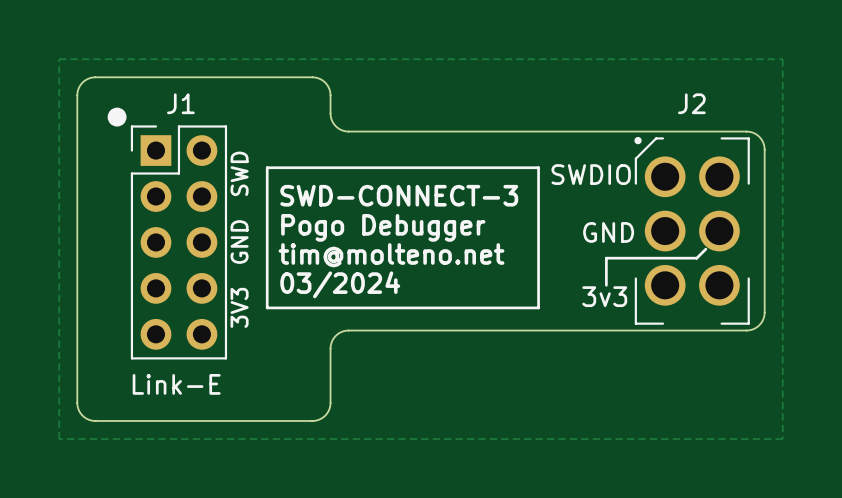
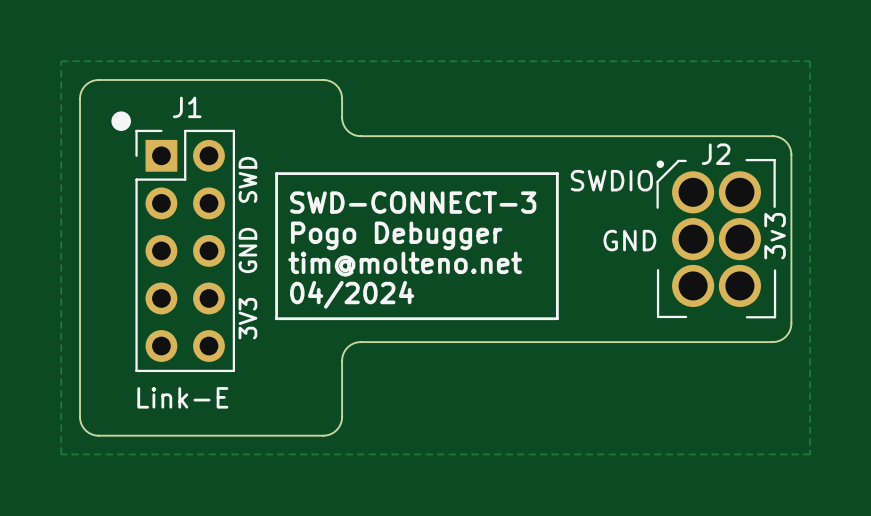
J2 name position: J2 (691, 103) -> J2 (716, 154)
J2 footprint: [634, 136, 750, 325] -> [656, 158, 777, 319]
line: (705, 249) (696, 258) (606, 258) (606, 285) -> none
text: 03/2024 (340, 284) -> 04/2024 (352, 294)
text rotation: 0° (604, 296) -> 90° counterclockwise (775, 236)
text position: 3v3 (604, 296) -> 3v3 (775, 236)

